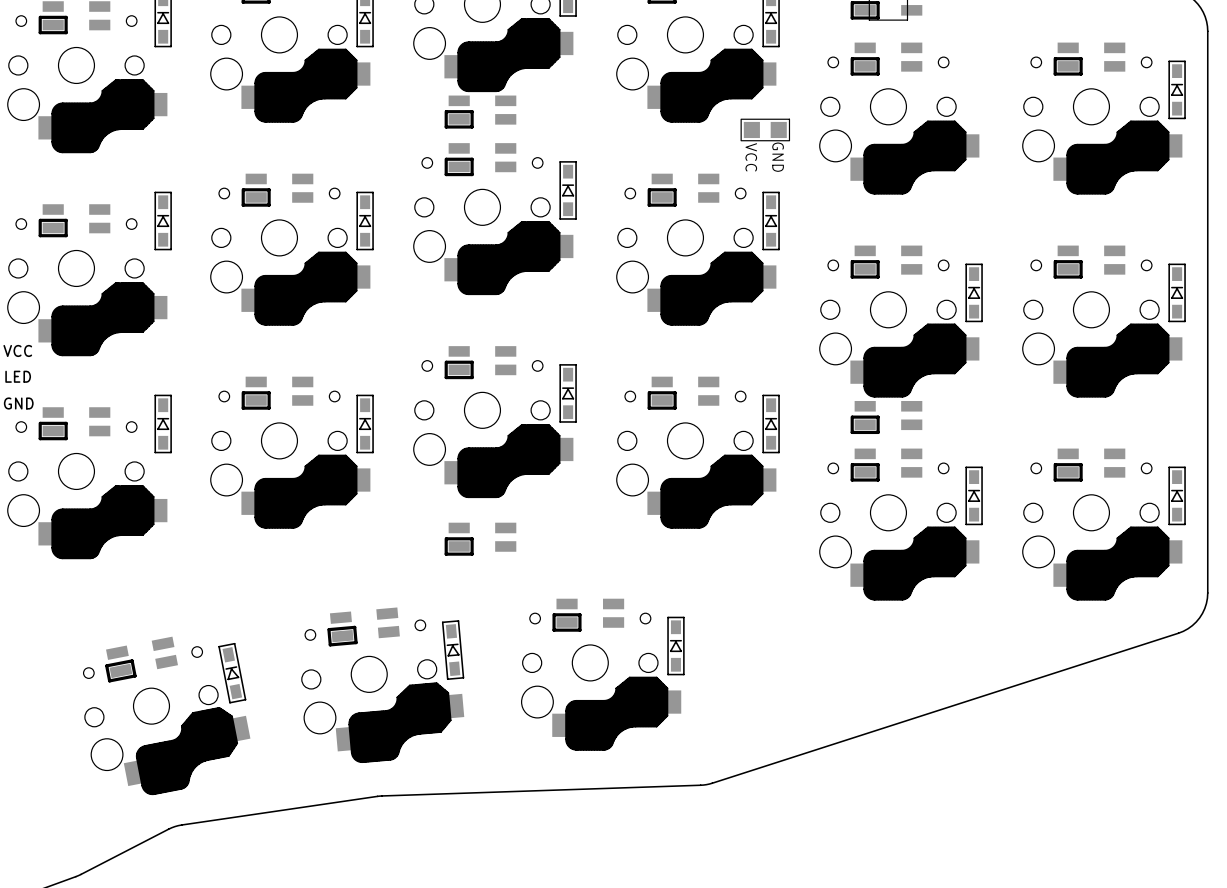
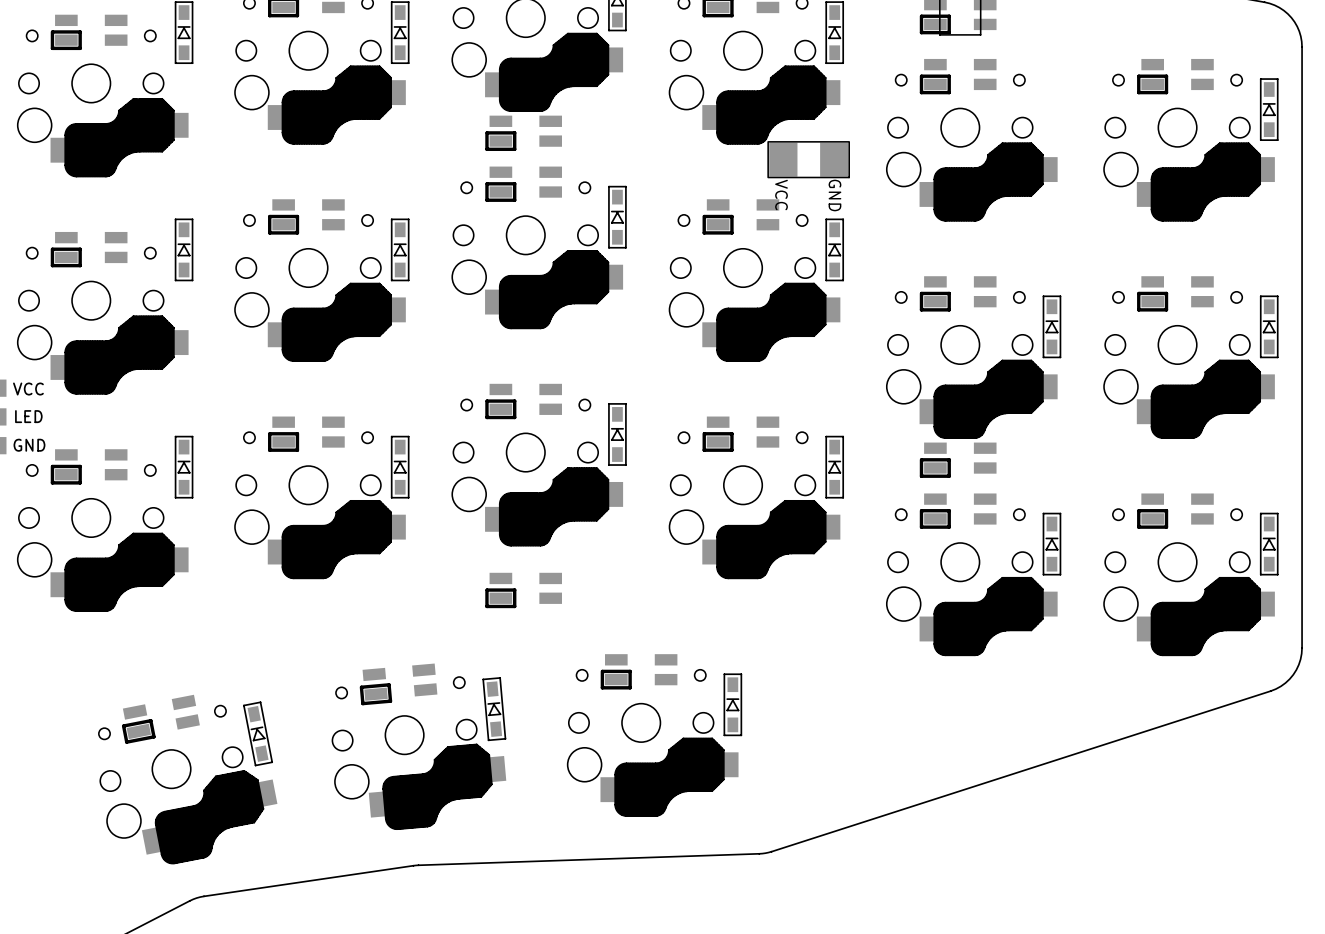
part: (765, 129) -> none
part: none -> (808, 159)

